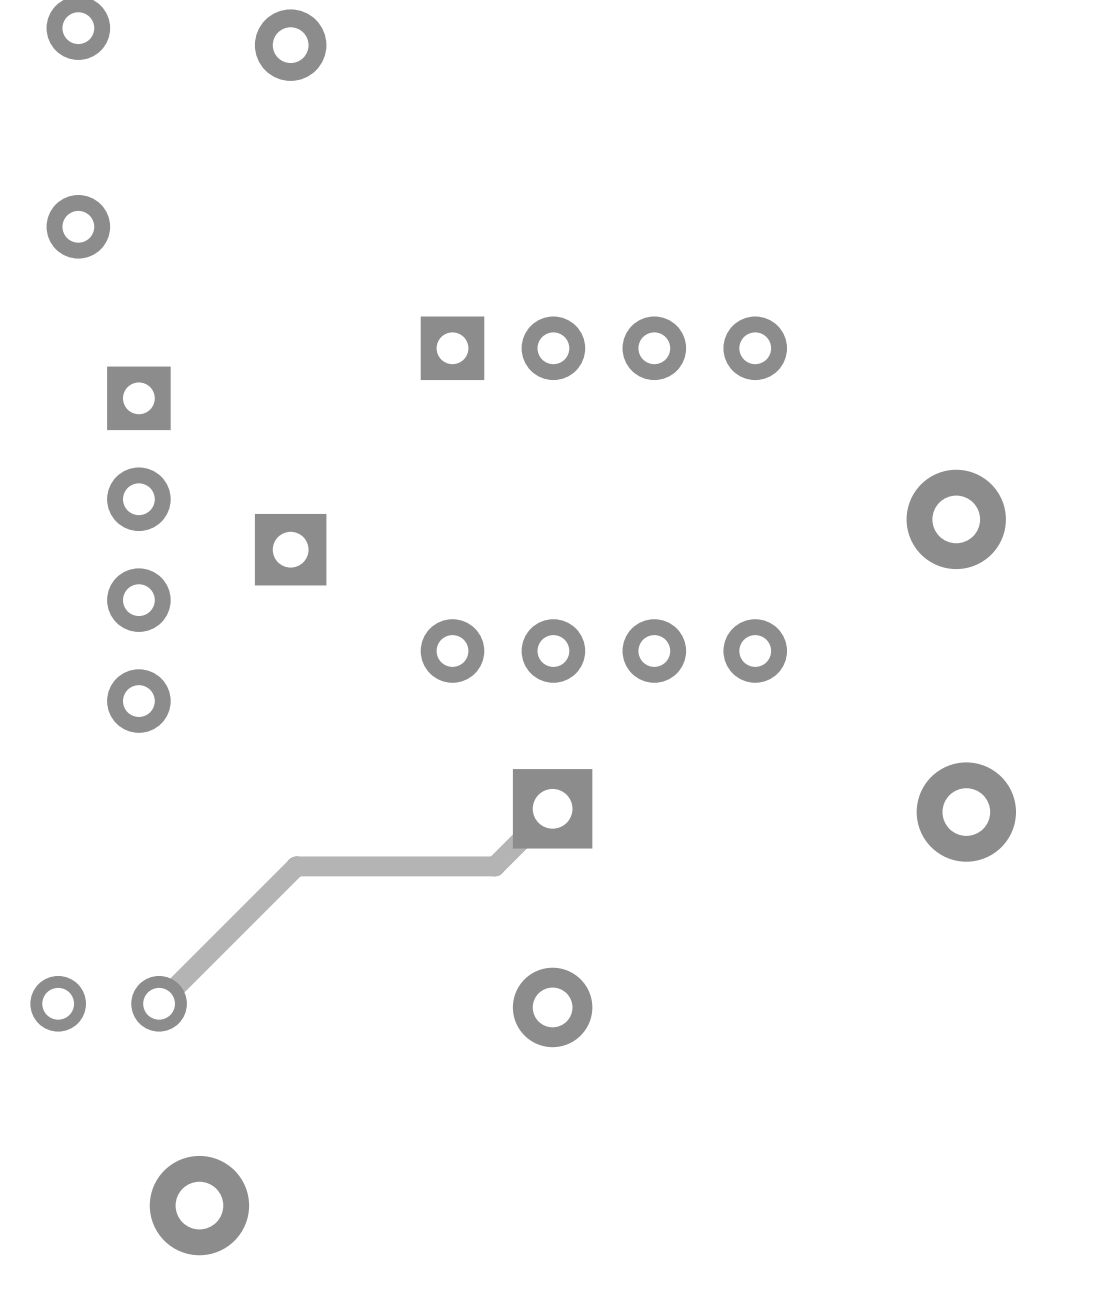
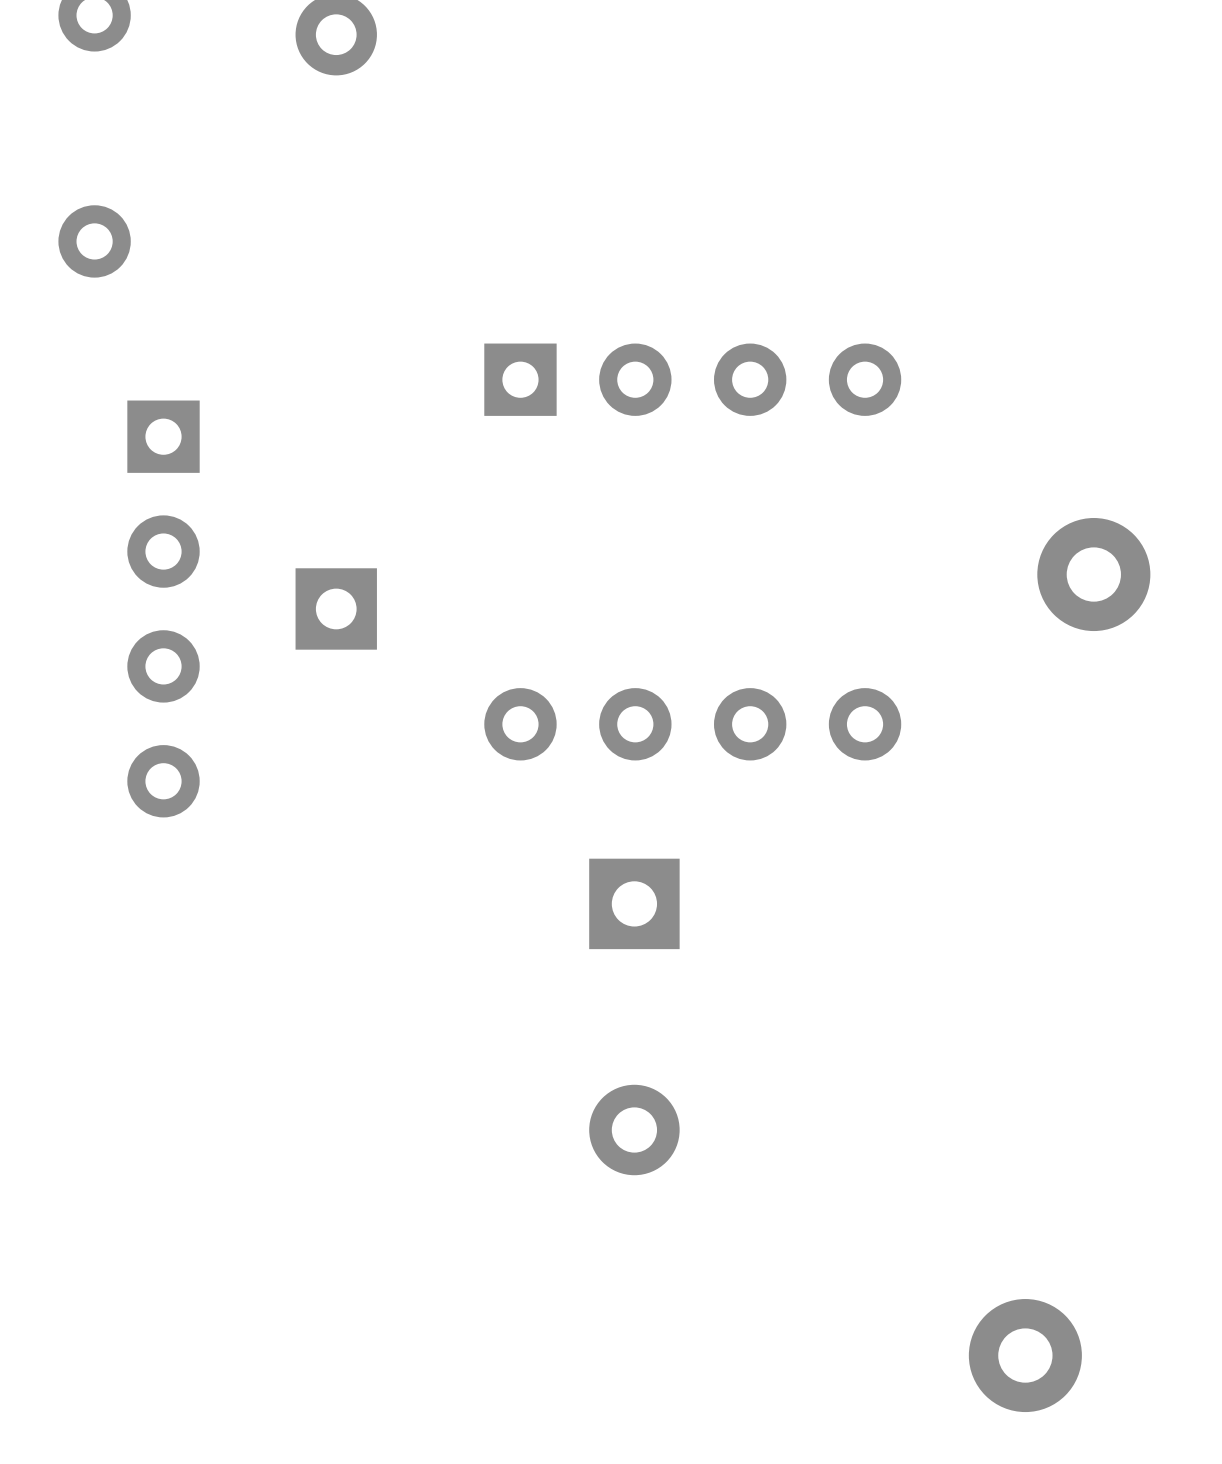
track: (552, 808) (495, 866) (296, 866) (159, 1003) -> none
part: (966, 812) -> none
part: (108, 1003) -> none
part: (199, 1205) -> none
part: none -> (1025, 1355)

